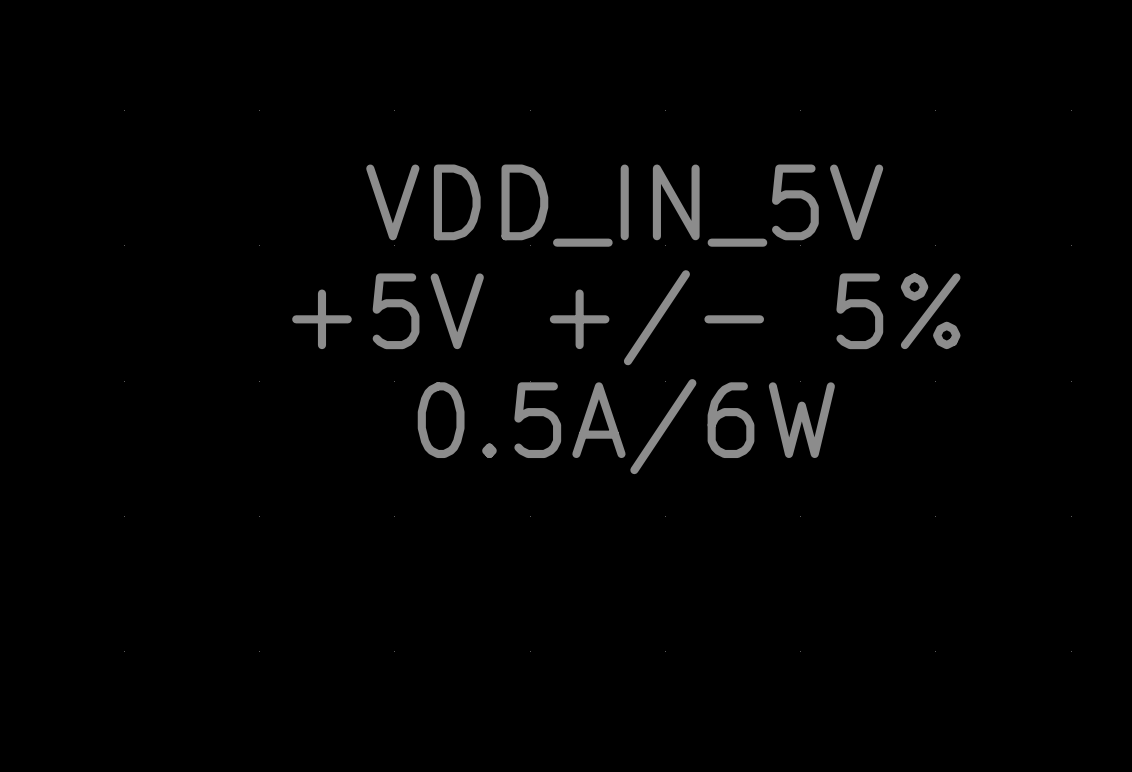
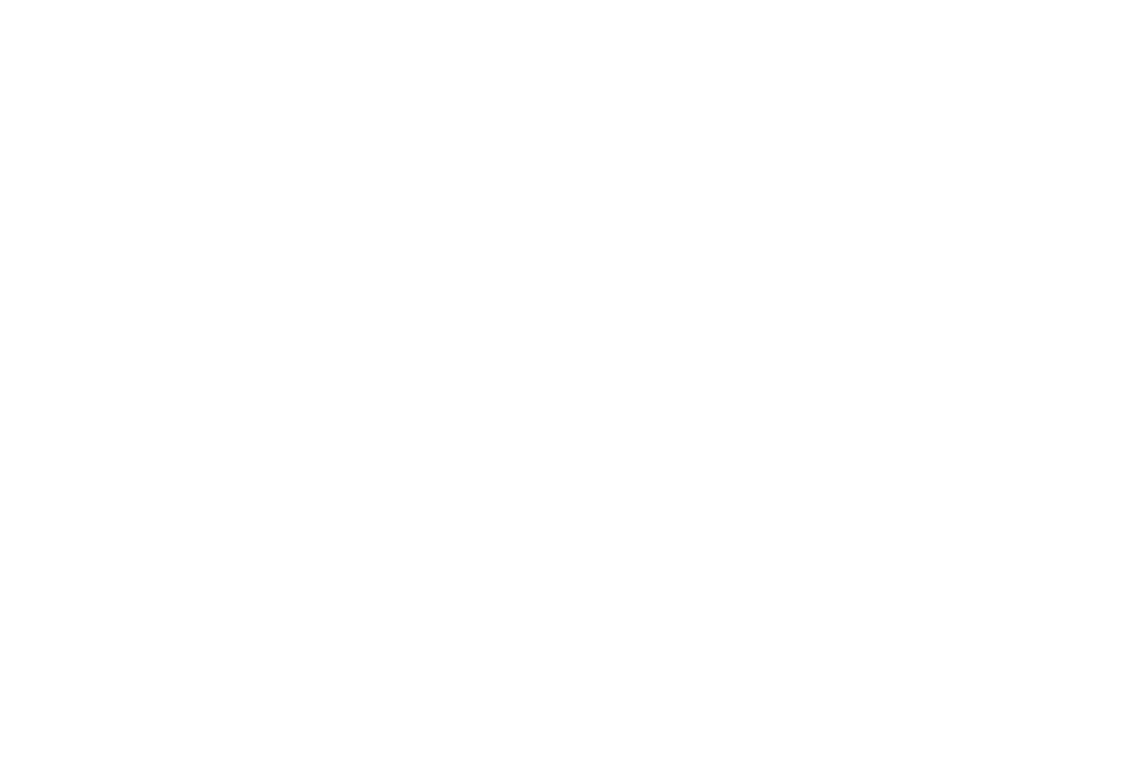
text: VDD_IN_5V (624, 205) -> none
text: +5V +/- 5% (626, 317) -> none
text: 0.5A/6W (626, 426) -> none

